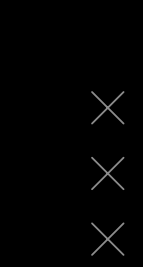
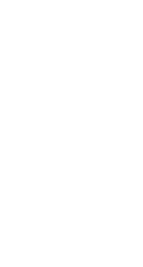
no-connect mark: (107, 107) -> none
no-connect mark: (107, 173) -> none
no-connect mark: (107, 239) -> none

